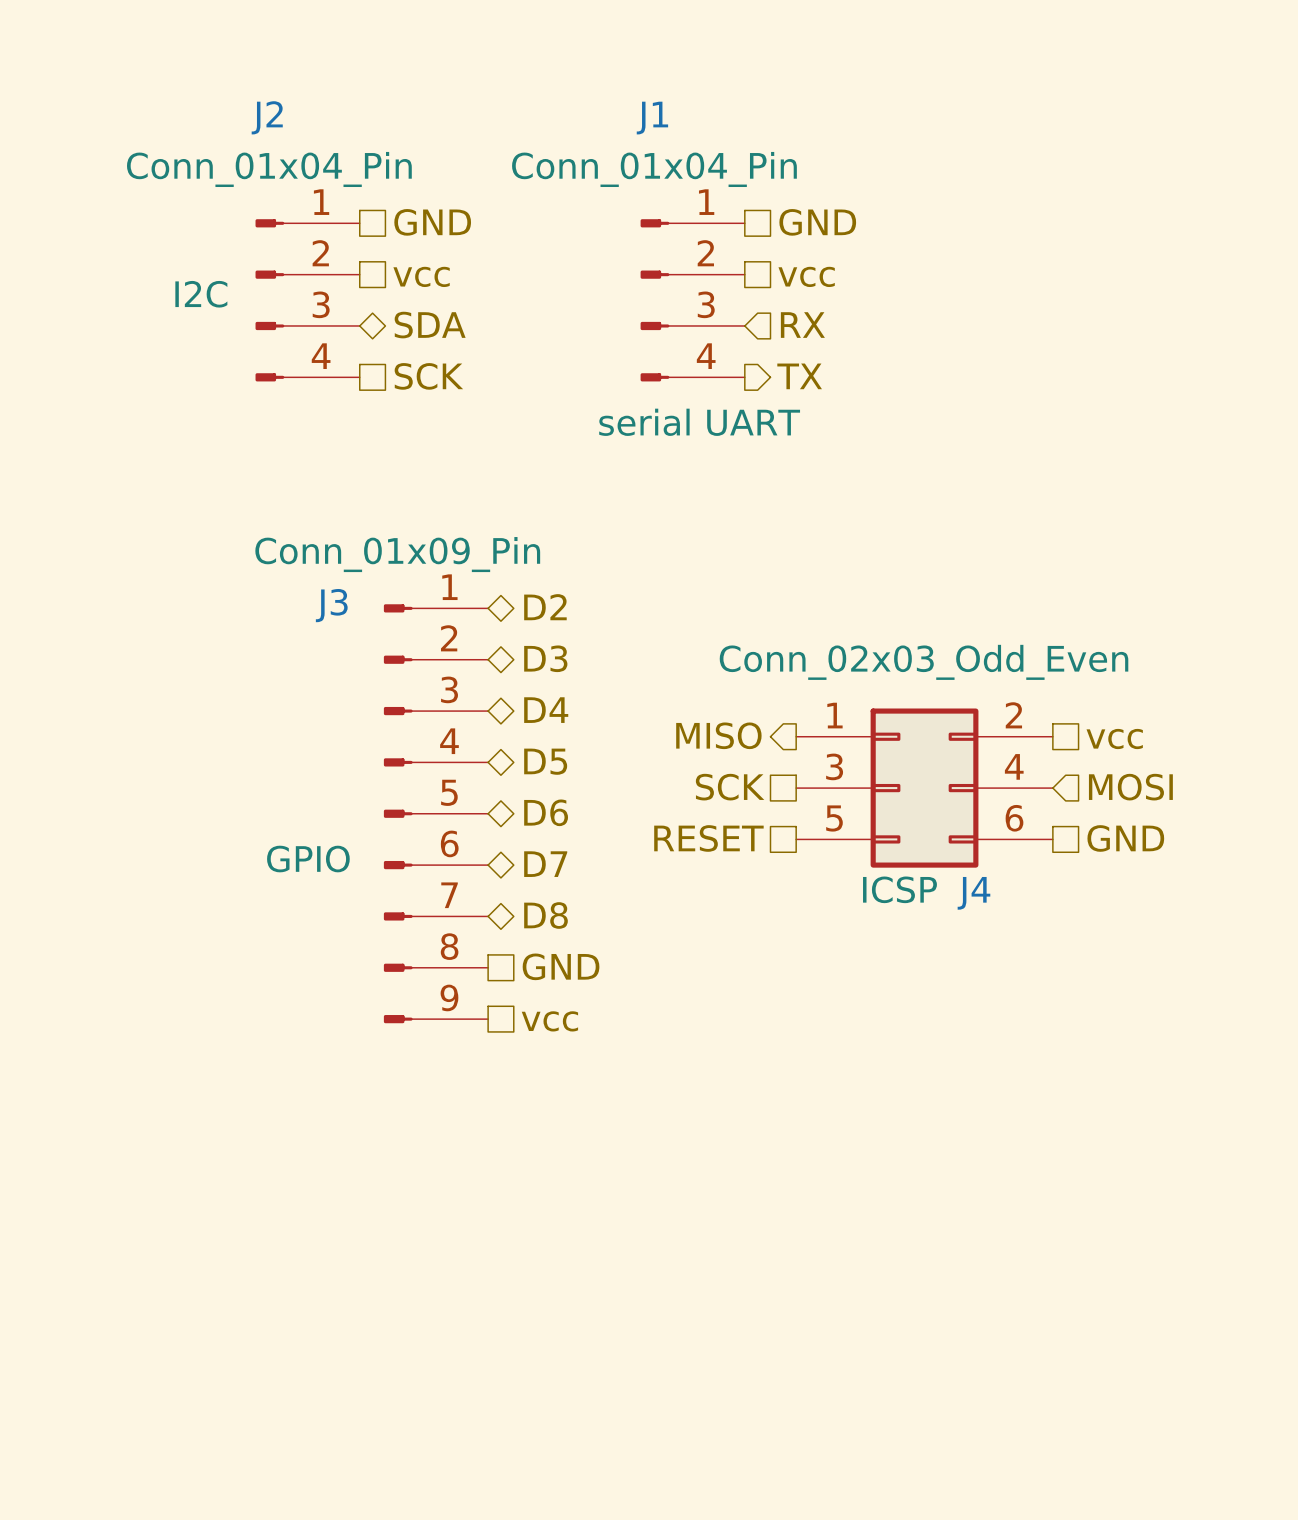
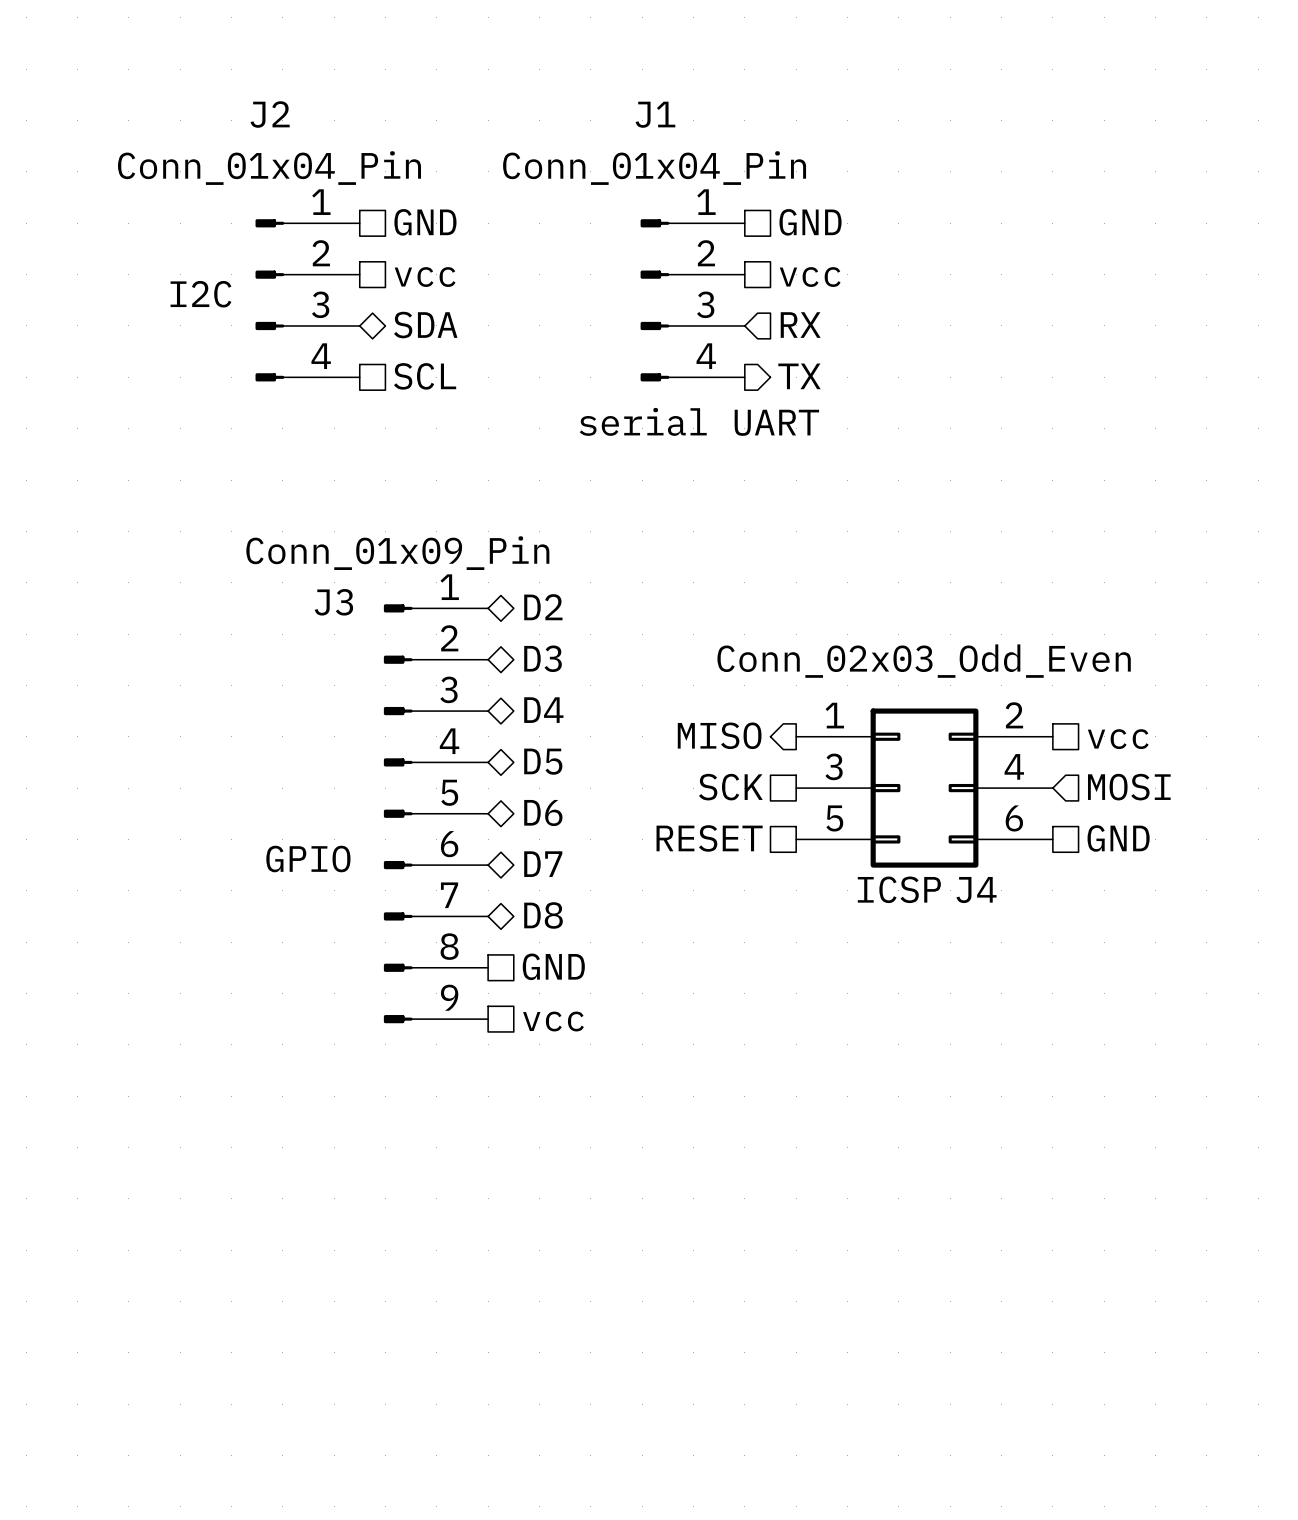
hierarchical label: SCK (428, 376) -> SCL (425, 376)

